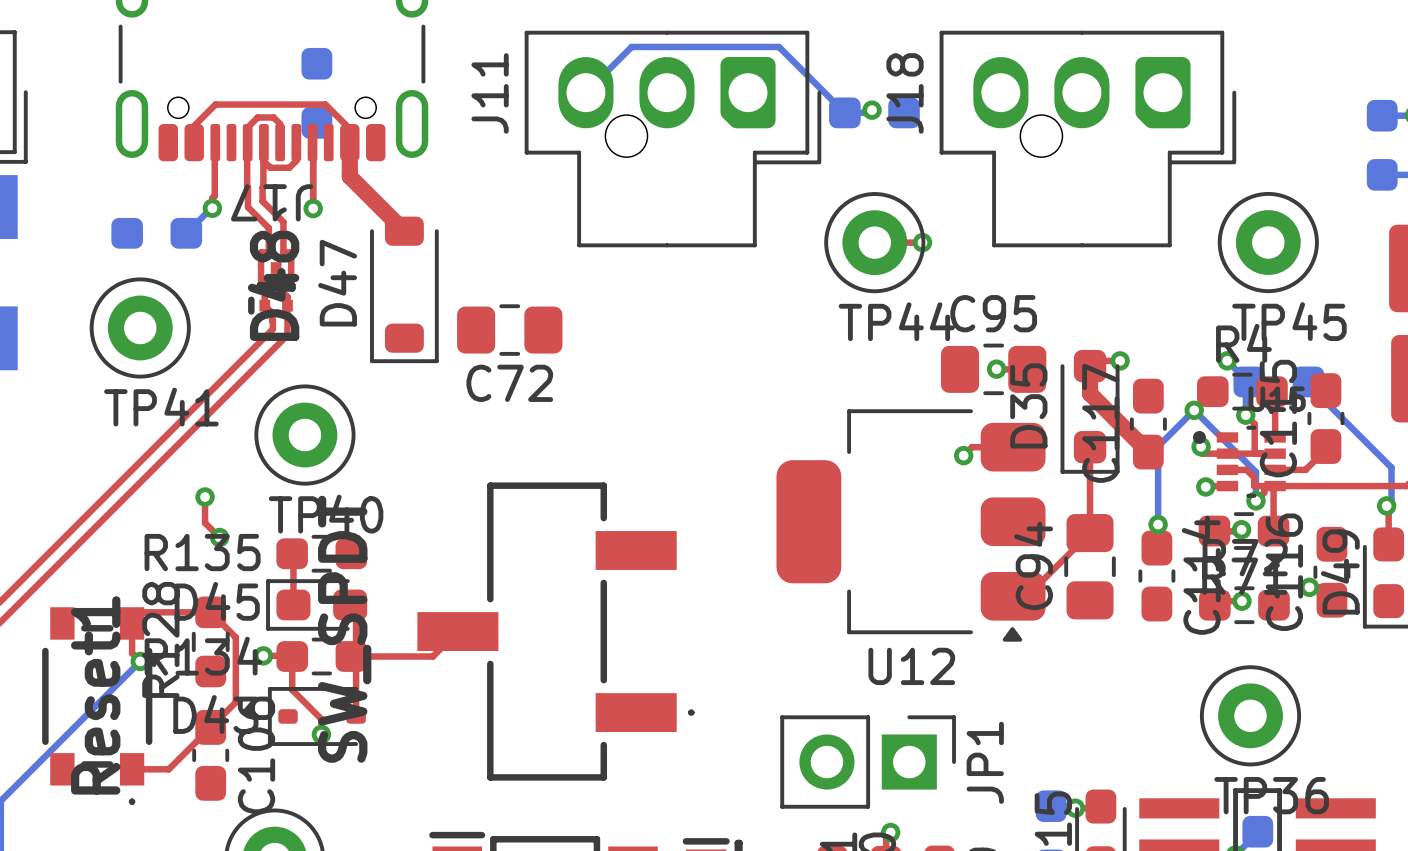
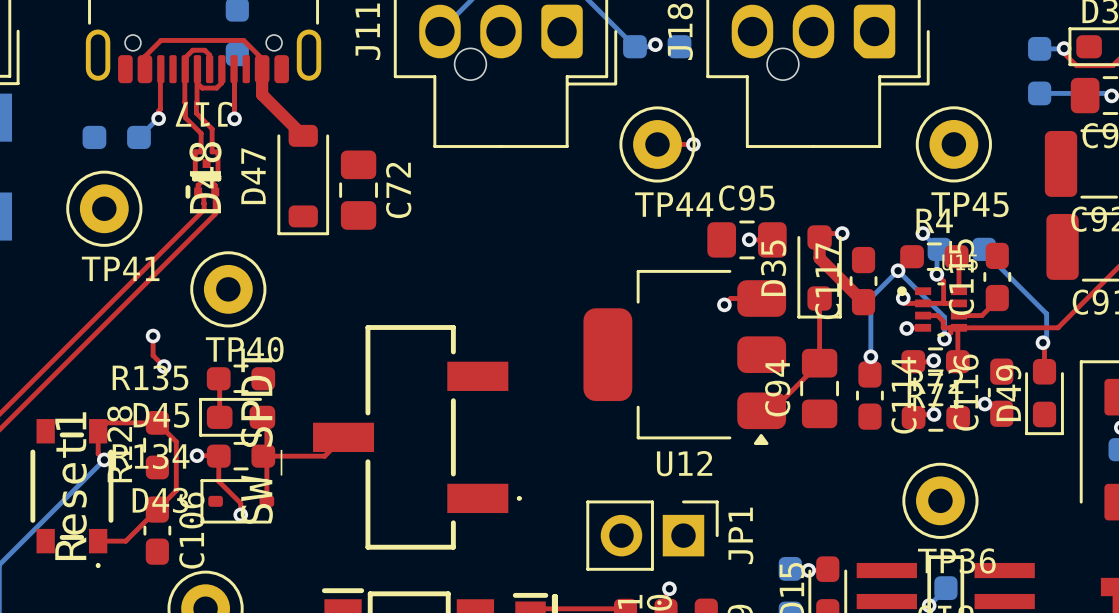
C72 rotation: 0° (509, 330) -> 90° clockwise (358, 190)
C72 name position: C72 (509, 383) -> C72 (398, 190)

